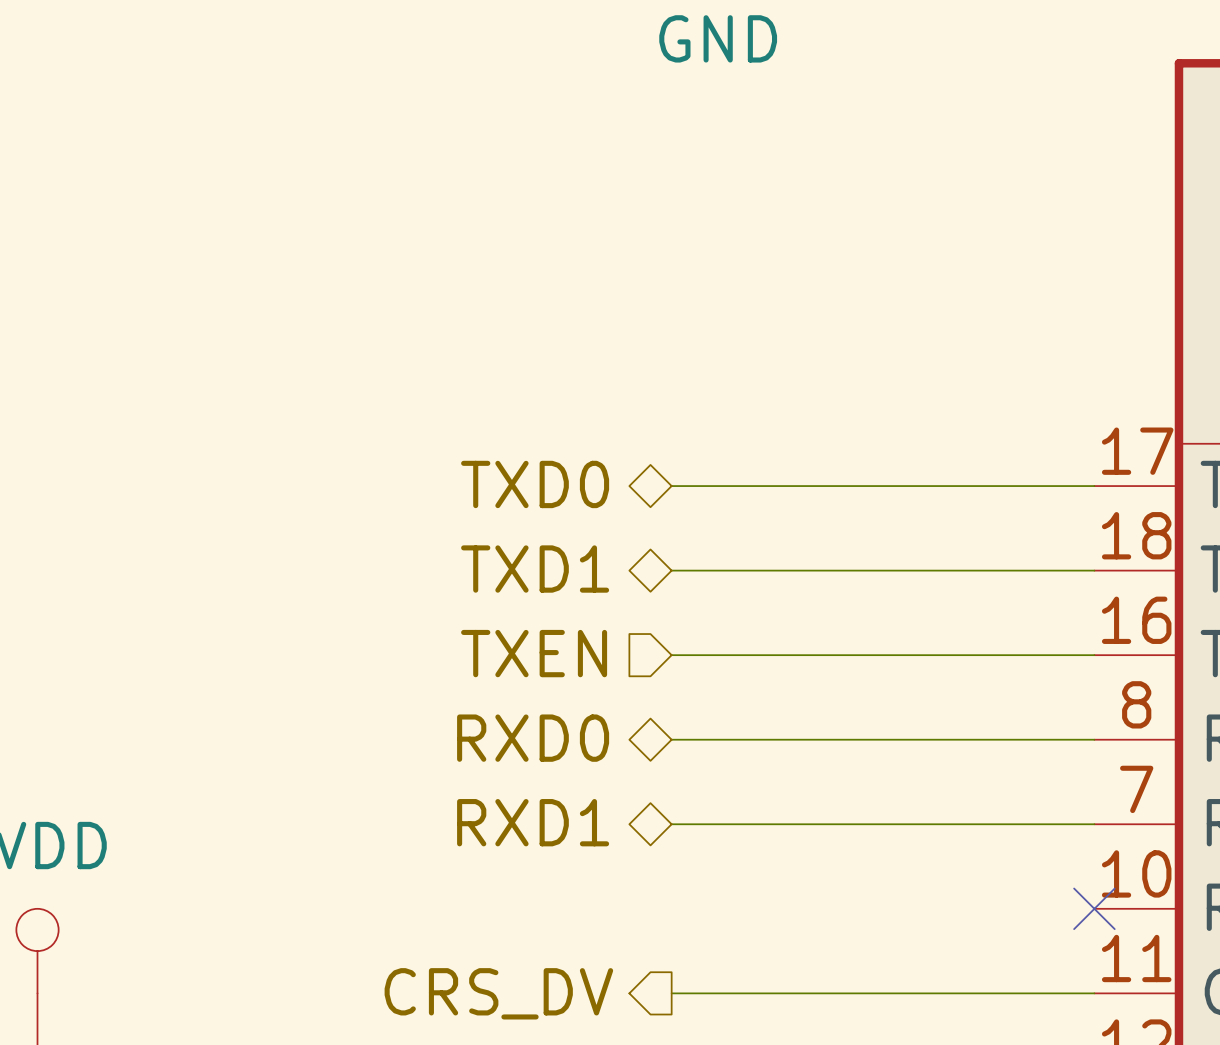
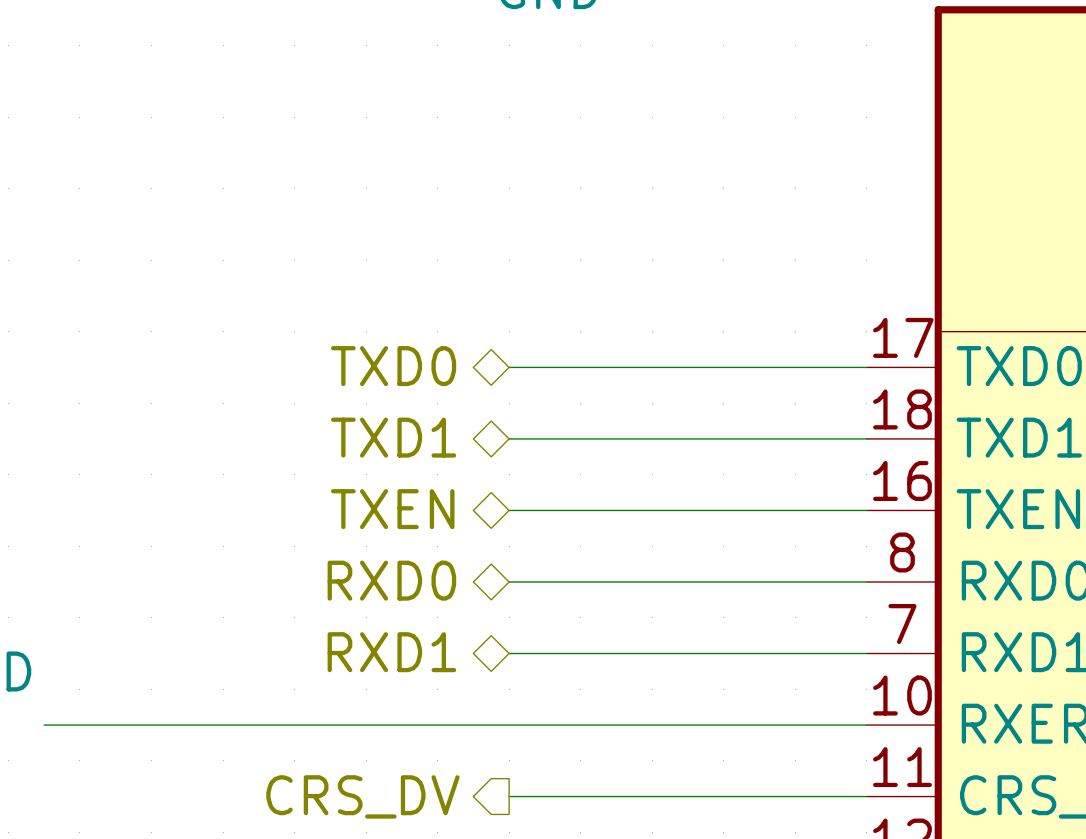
hierarchical label shape: input (534, 653) -> bidirectional (392, 509)
wire: none -> (44, 725) (866, 725)
no-connect mark: (1094, 908) -> none

